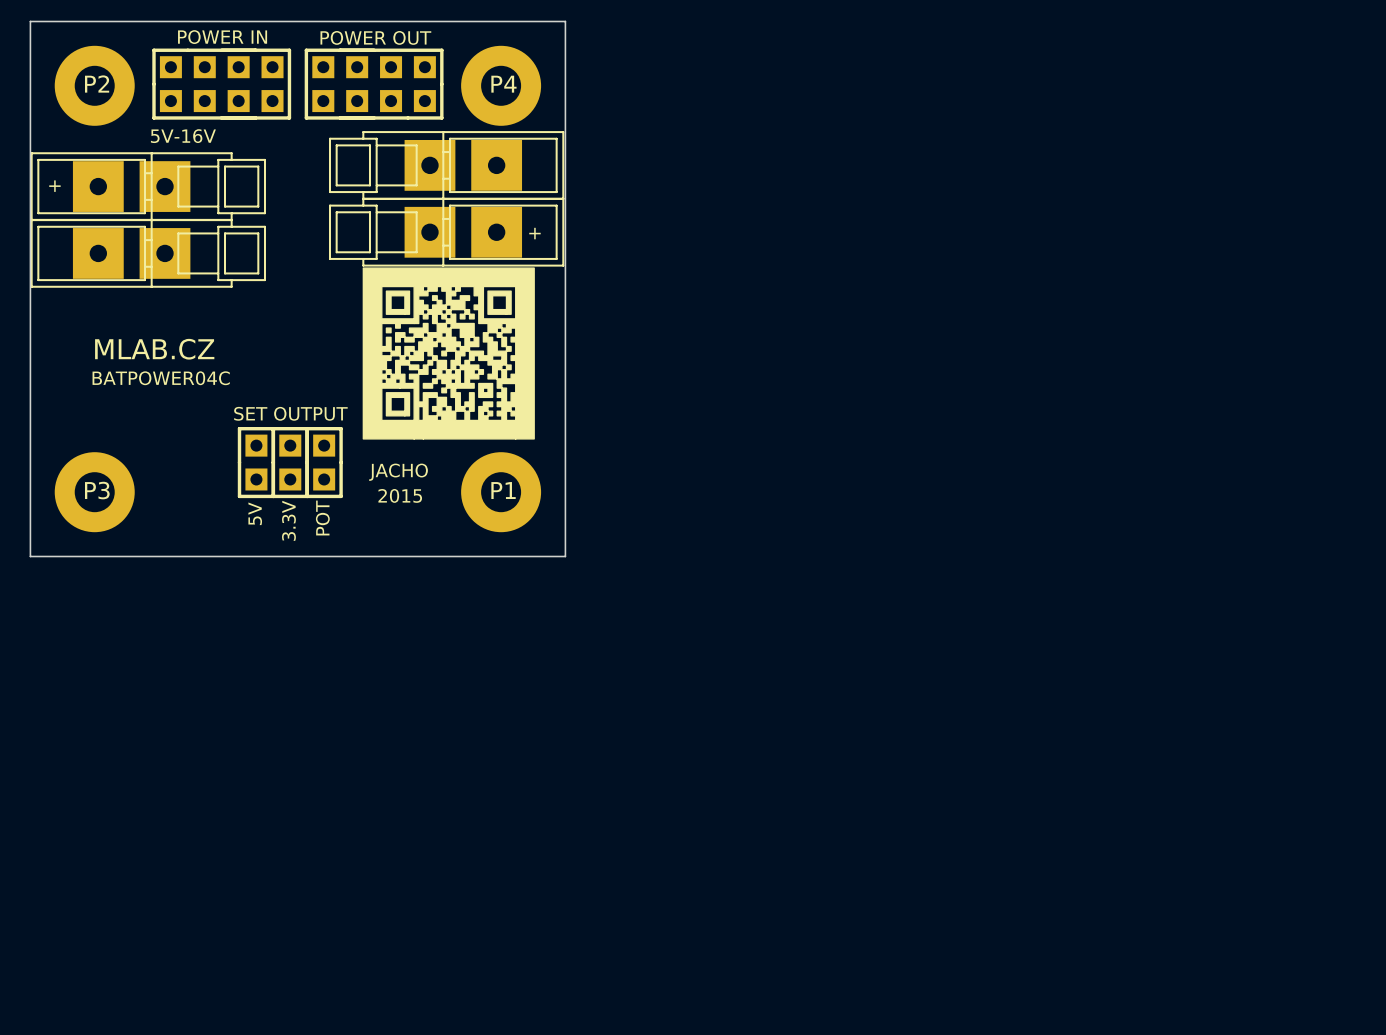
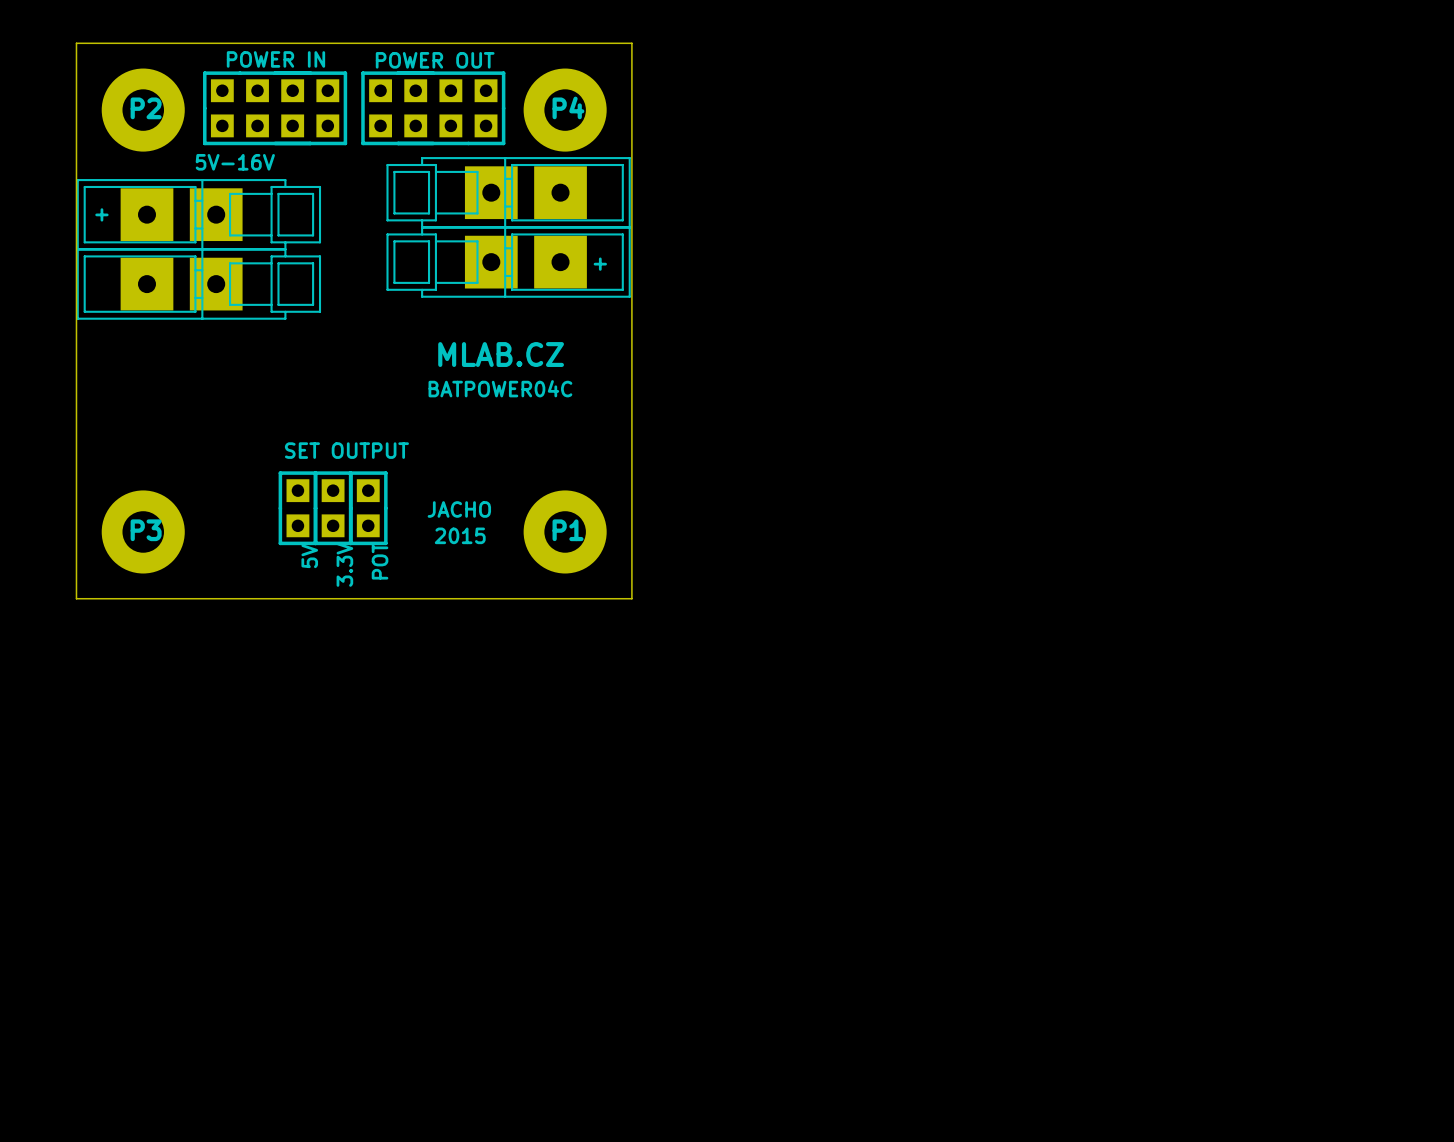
drawing: [362, 267, 535, 440] -> none
text position: MLAB.CZ (154, 349) -> MLAB.CZ (501, 354)
text position: BATPOWER04C (161, 378) -> BATPOWER04C (500, 388)
part: (256, 462) -> none
part: (290, 462) -> none
part: (324, 462) -> none
part: none -> (297, 508)
part: none -> (333, 508)
part: none -> (368, 508)

